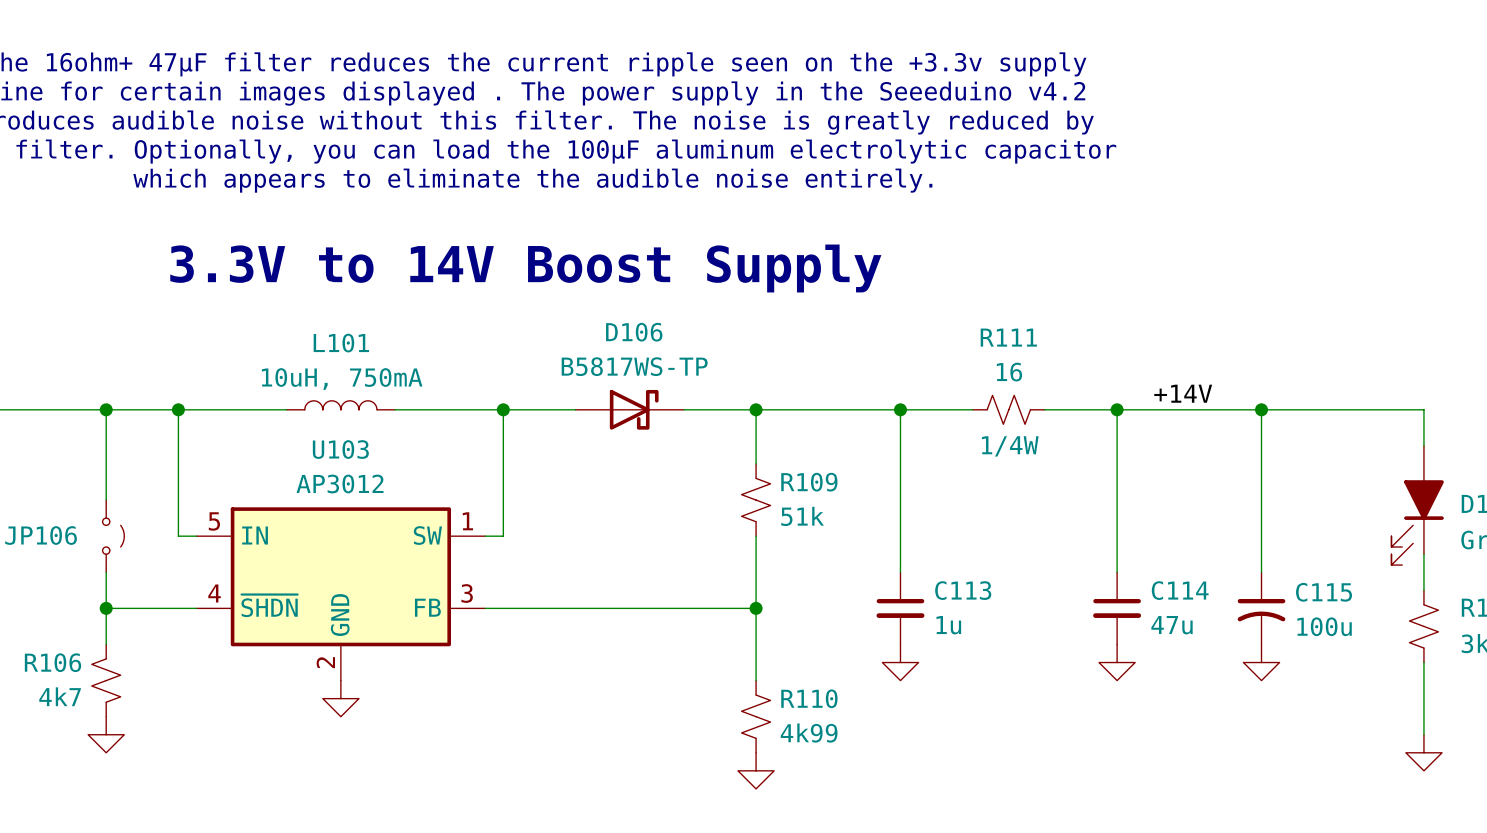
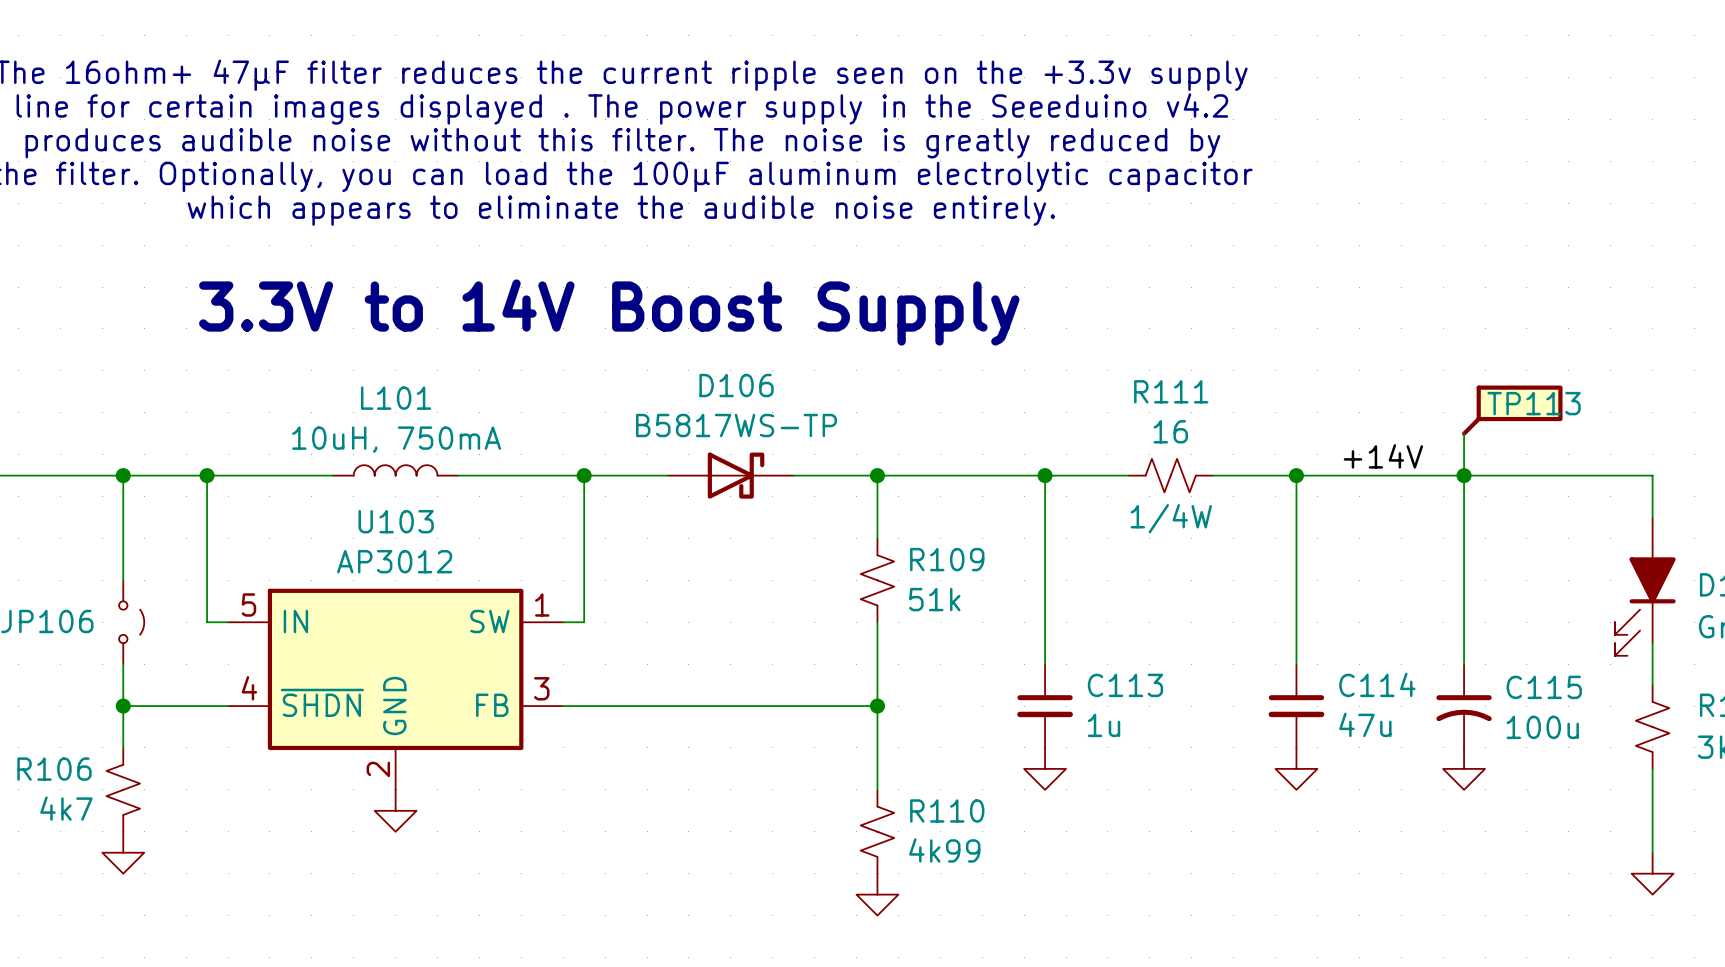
TP113: none -> (1512, 410)
wire: none -> (1464, 433) (1464, 475)

